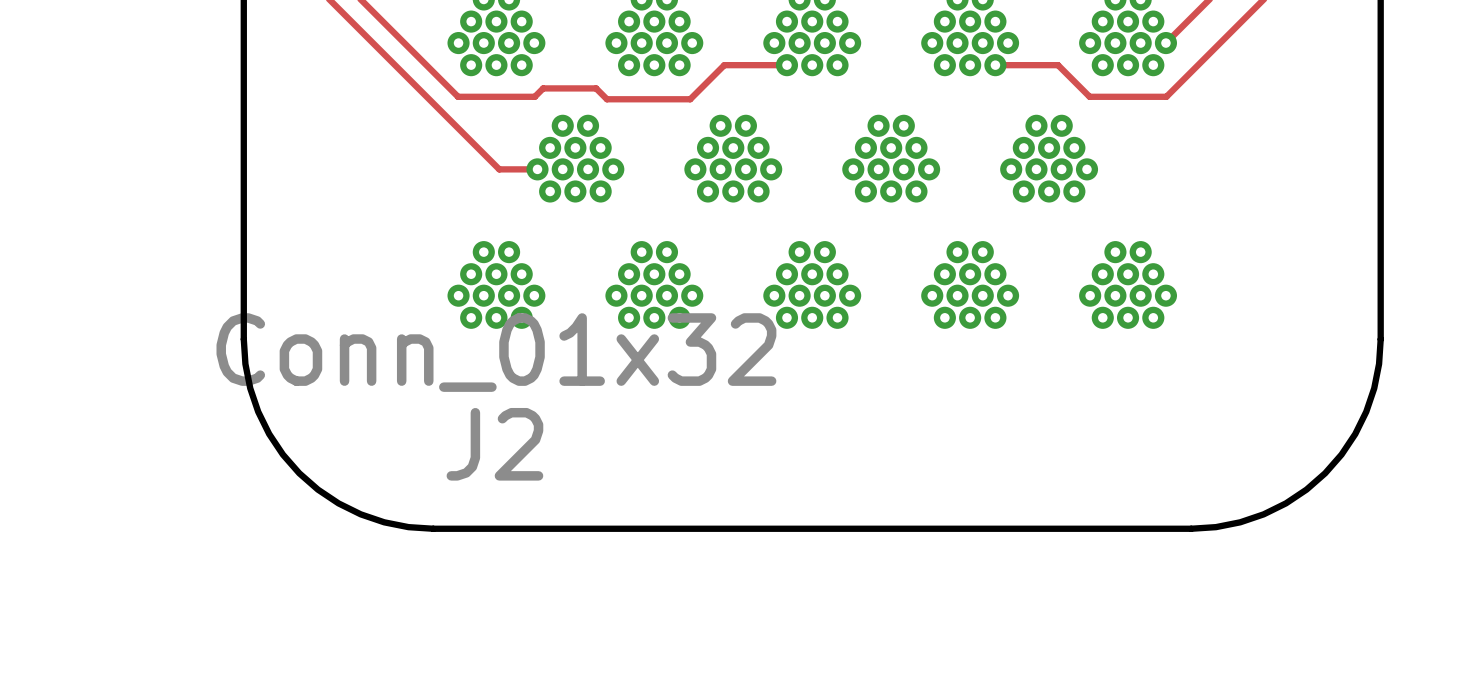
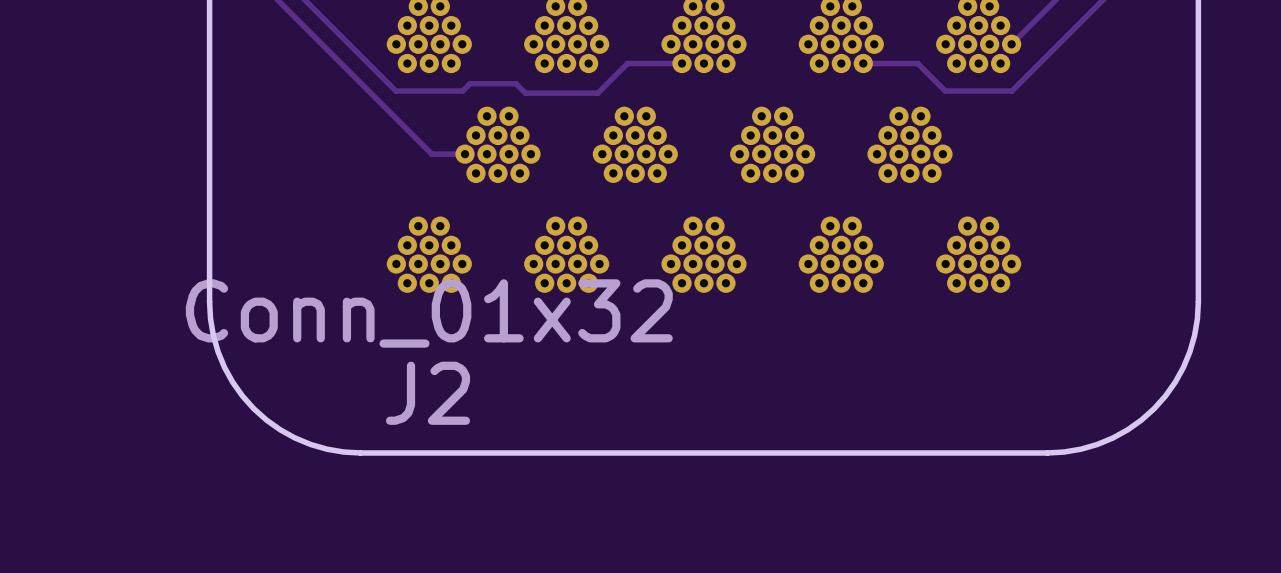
board edge: (243, 339) (245, 364) (250, 388) (258, 411) (269, 434) (282, 454) (299, 473) (317, 489) (338, 503) (360, 514) (384, 522) (408, 527) (433, 528) (1191, 528) (1215, 527) (1240, 522) (1263, 514) (1285, 503) (1306, 489) (1325, 473) (1341, 454) (1355, 434) (1366, 411) (1374, 388) (1379, 364) (1380, 339) -> (209, 301) (210, 318) (218, 351) (232, 382) (253, 408) (280, 429) (295, 438) (327, 449) (360, 452) (1047, 452) (1080, 449) (1112, 438) (1127, 429) (1154, 408) (1165, 396) (1175, 382) (1189, 351) (1197, 318) (1198, 301)

